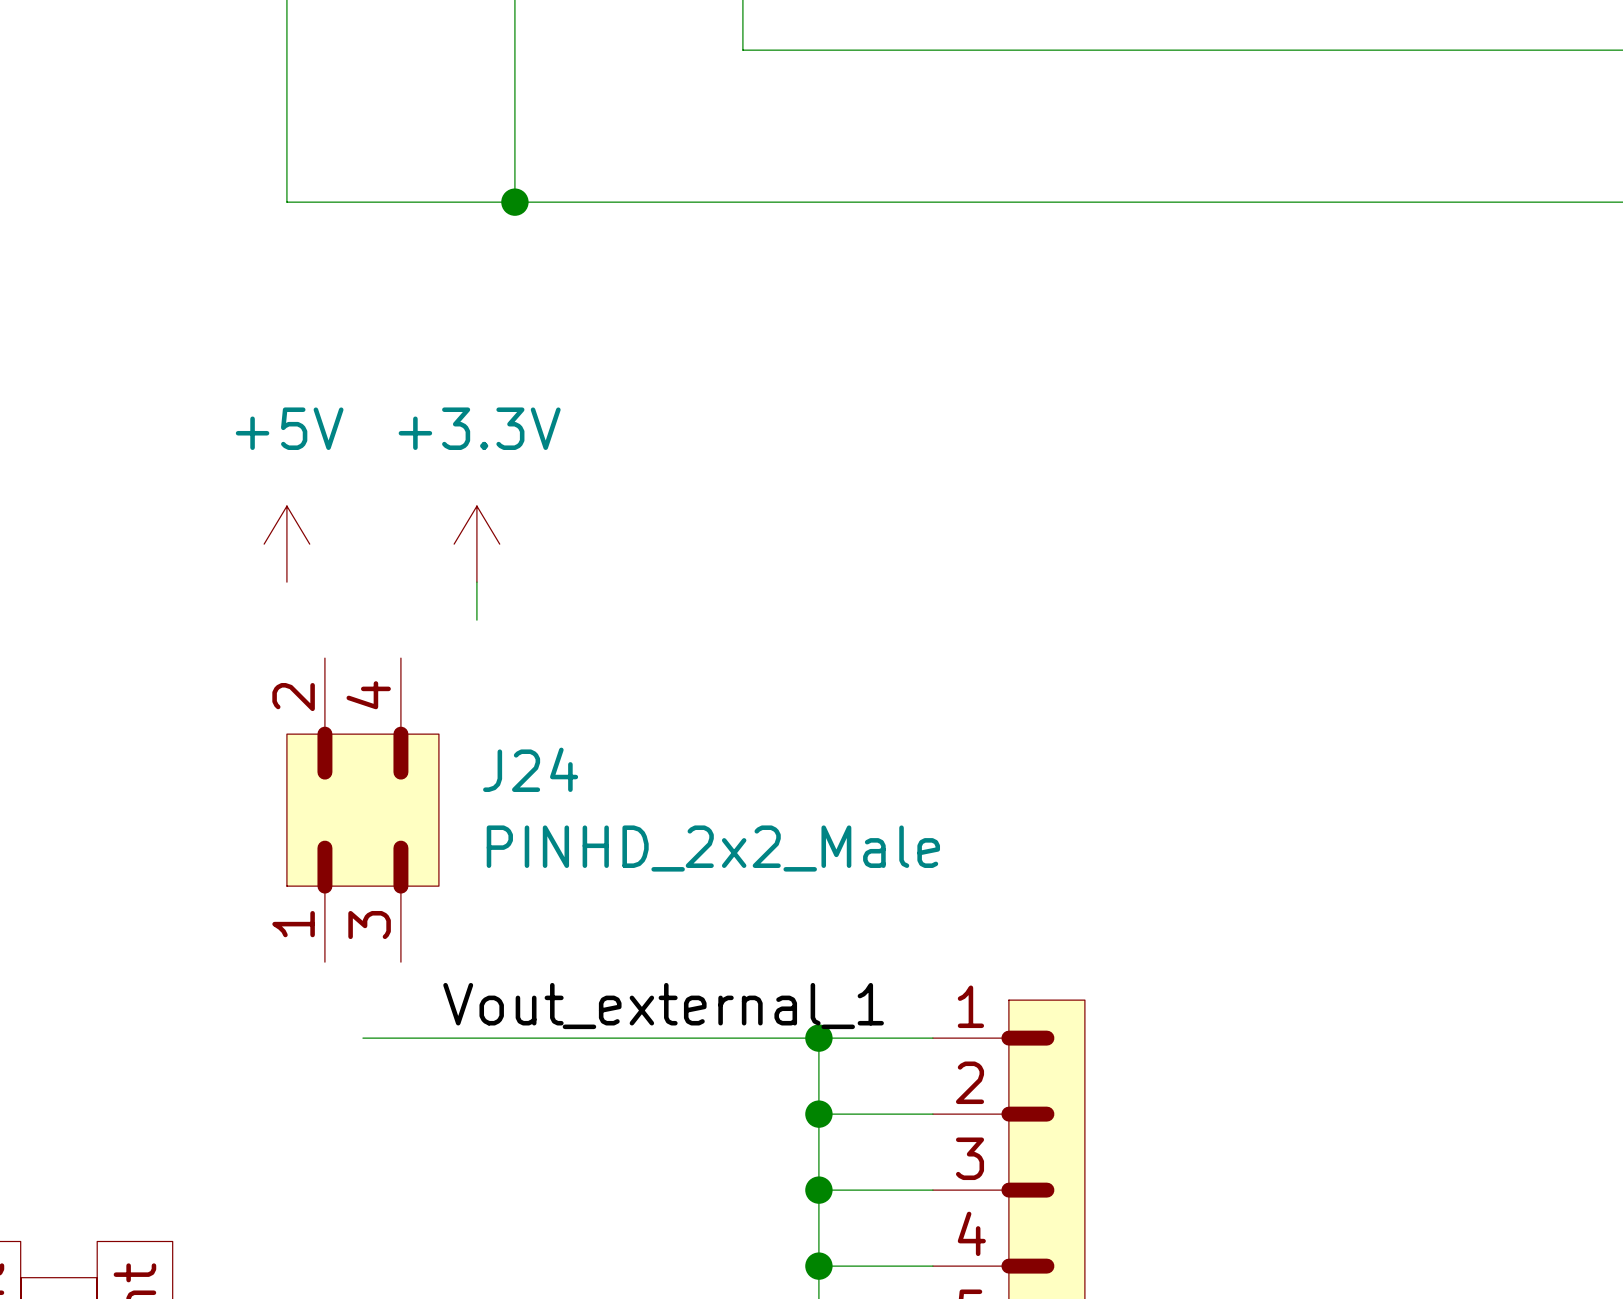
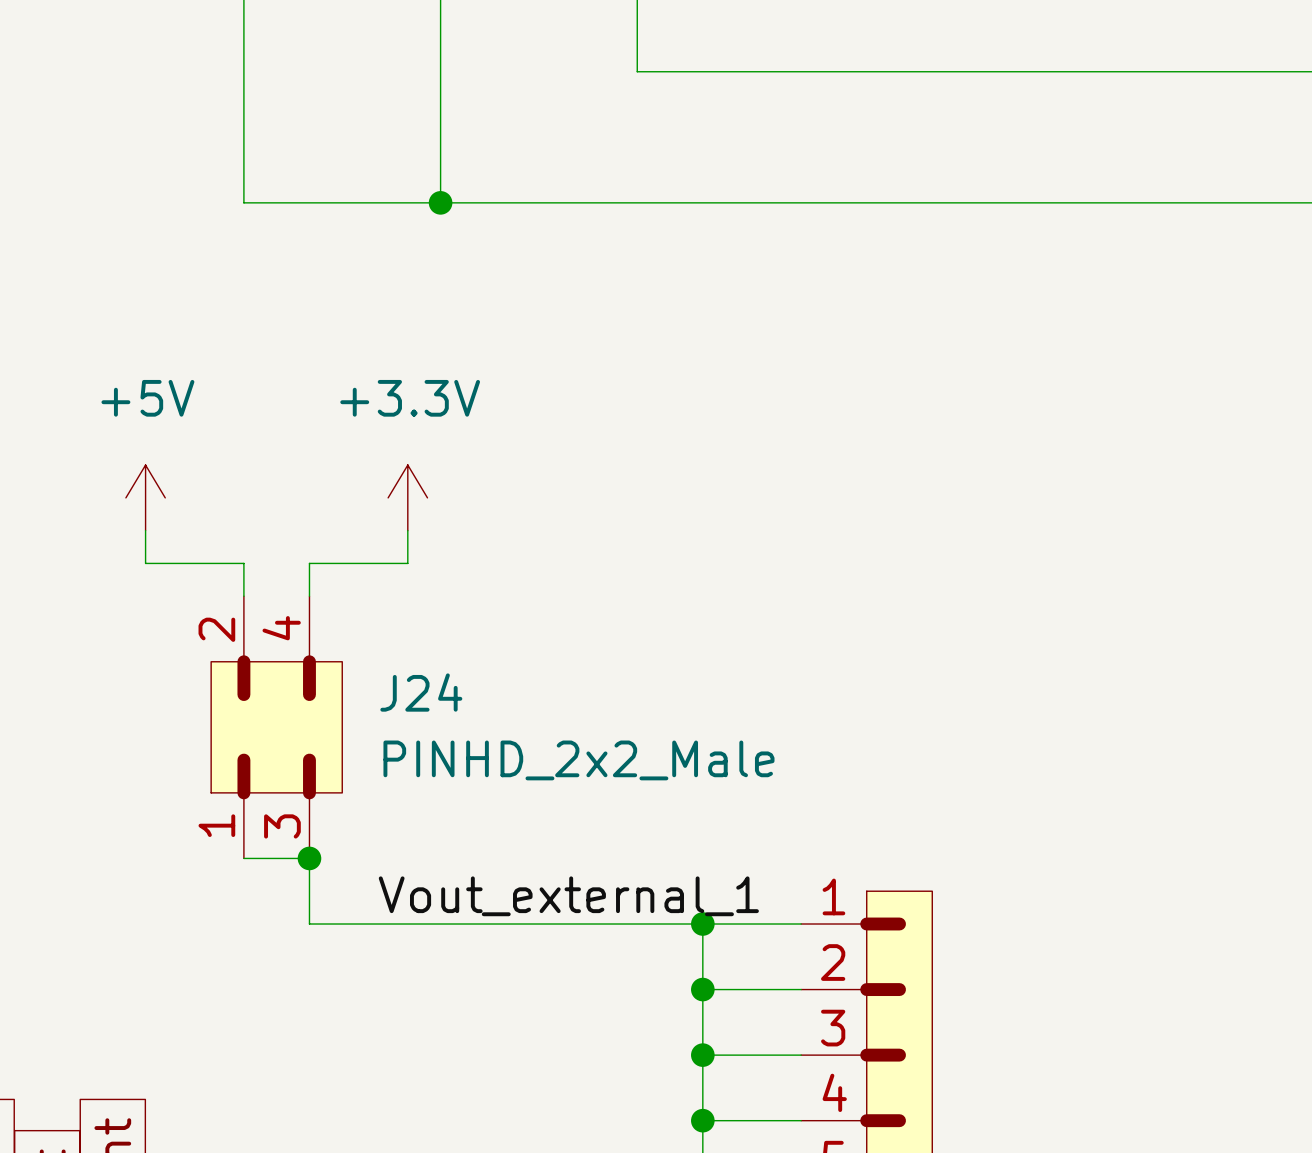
power symbol position: +5V (286, 544) -> +5V (145, 497)
wire: none -> (145, 530) (145, 563) (243, 563) (243, 596)
wire: none -> (407, 563) (309, 563) (309, 596)
J24 position: (362, 810) -> (276, 727)
wire: none -> (243, 858) (309, 858) (309, 924)
junction: none -> (309, 858)

